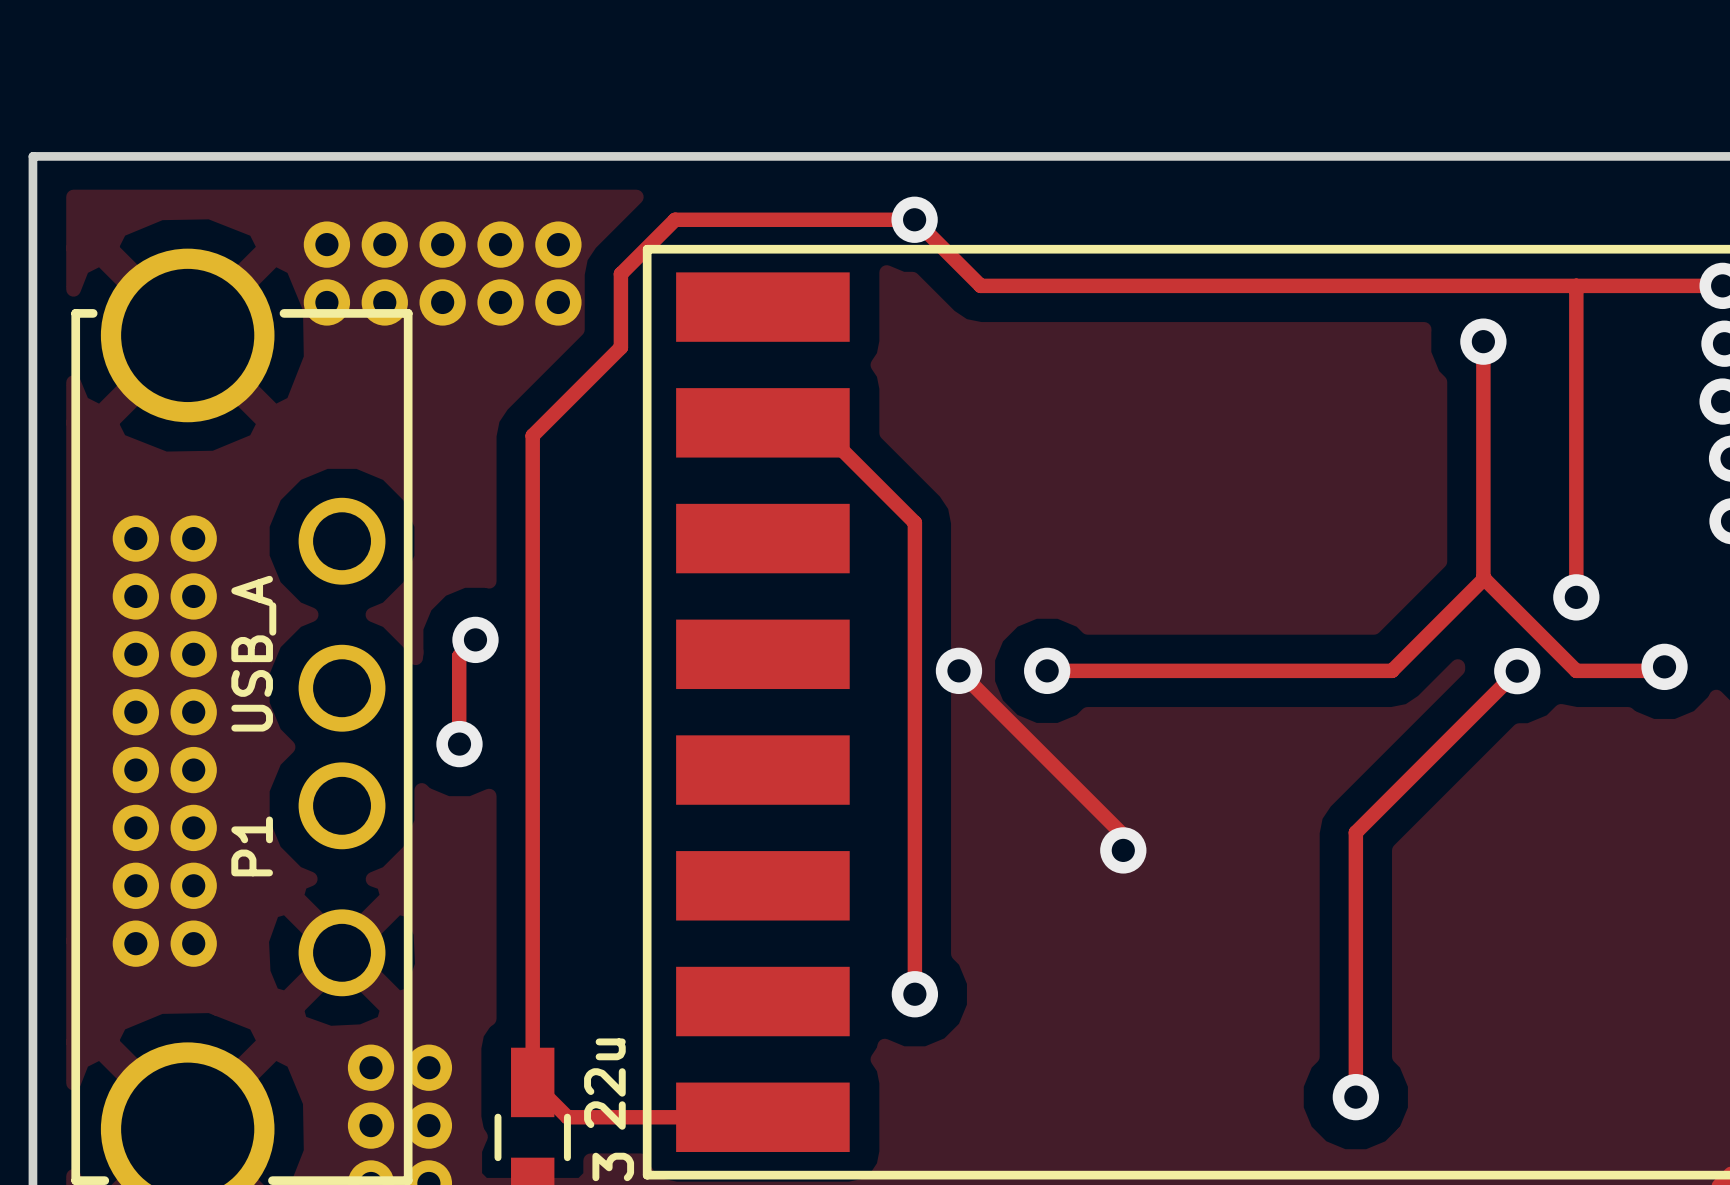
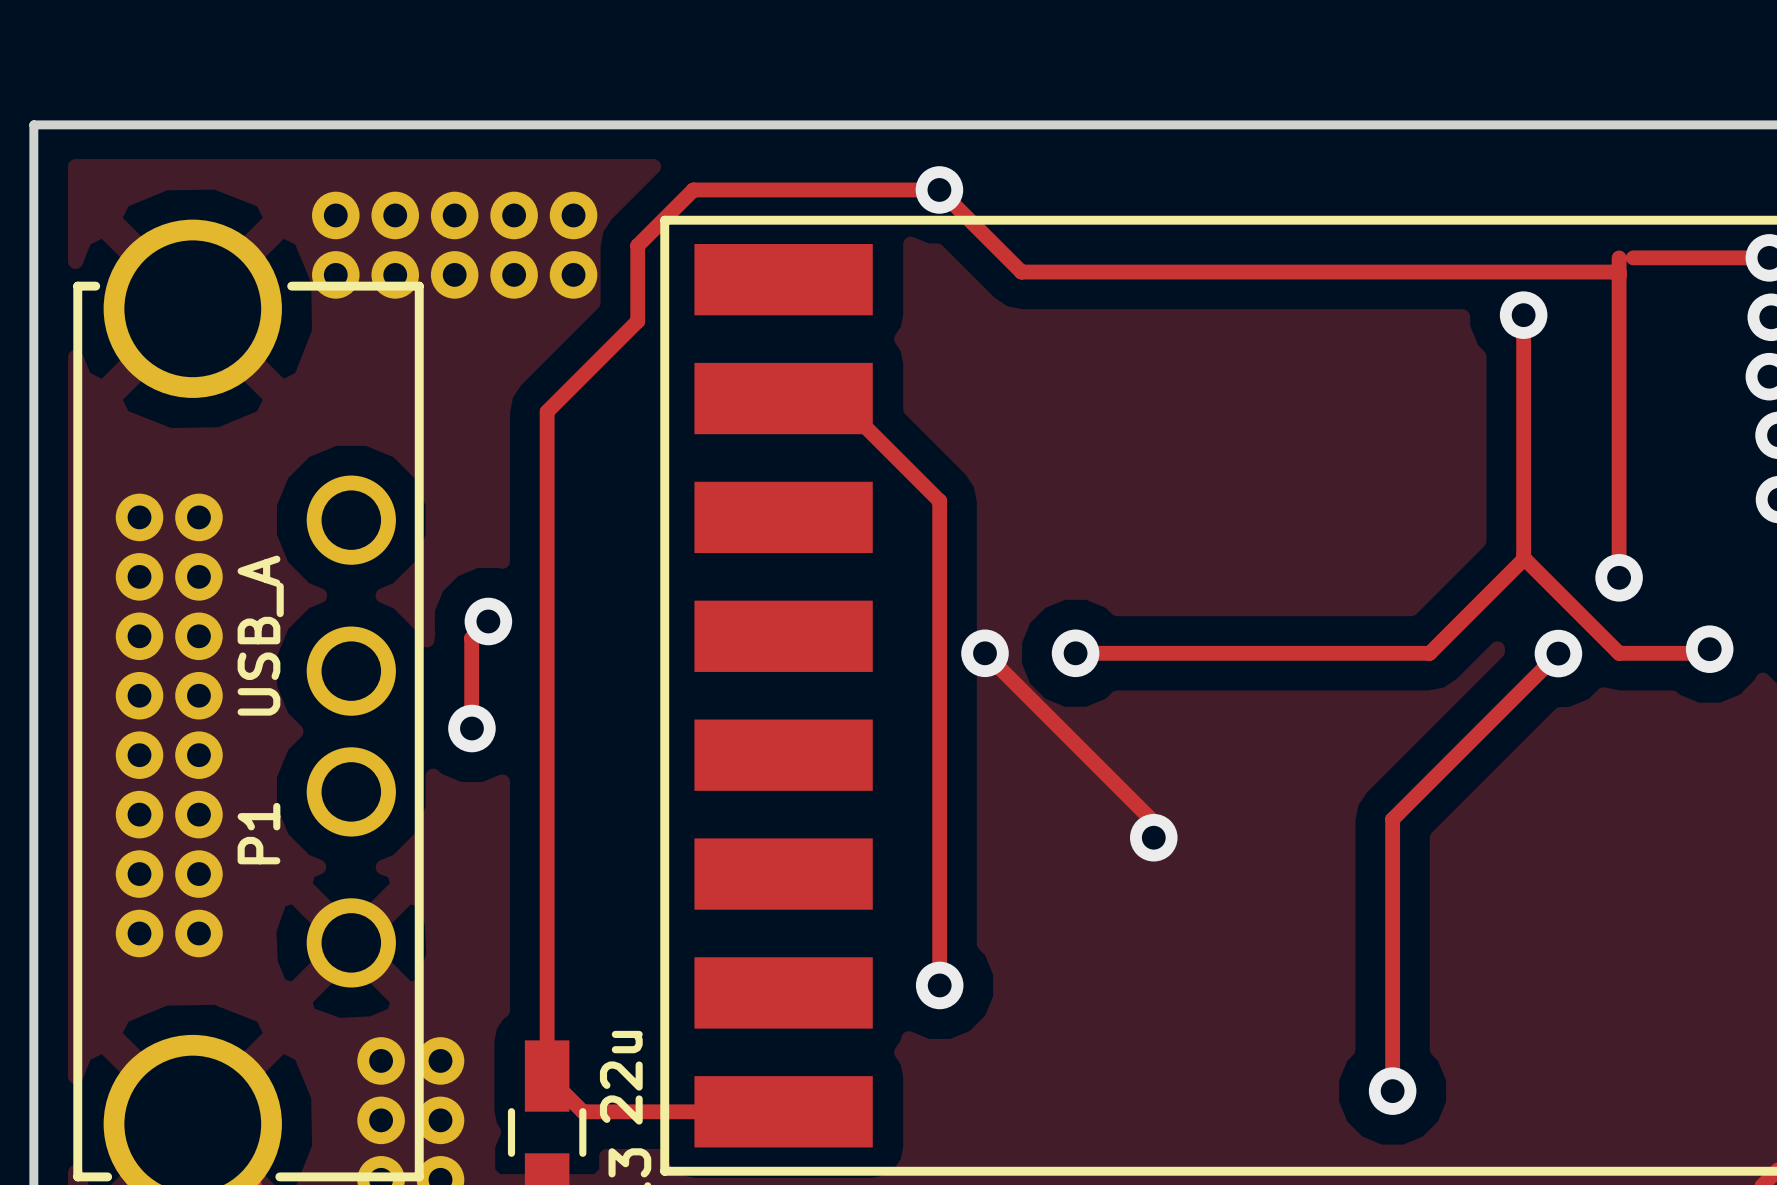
track: (980, 285) (1590, 285) -> (1007, 257) (1021, 272) (1615, 272) (1619, 275)

